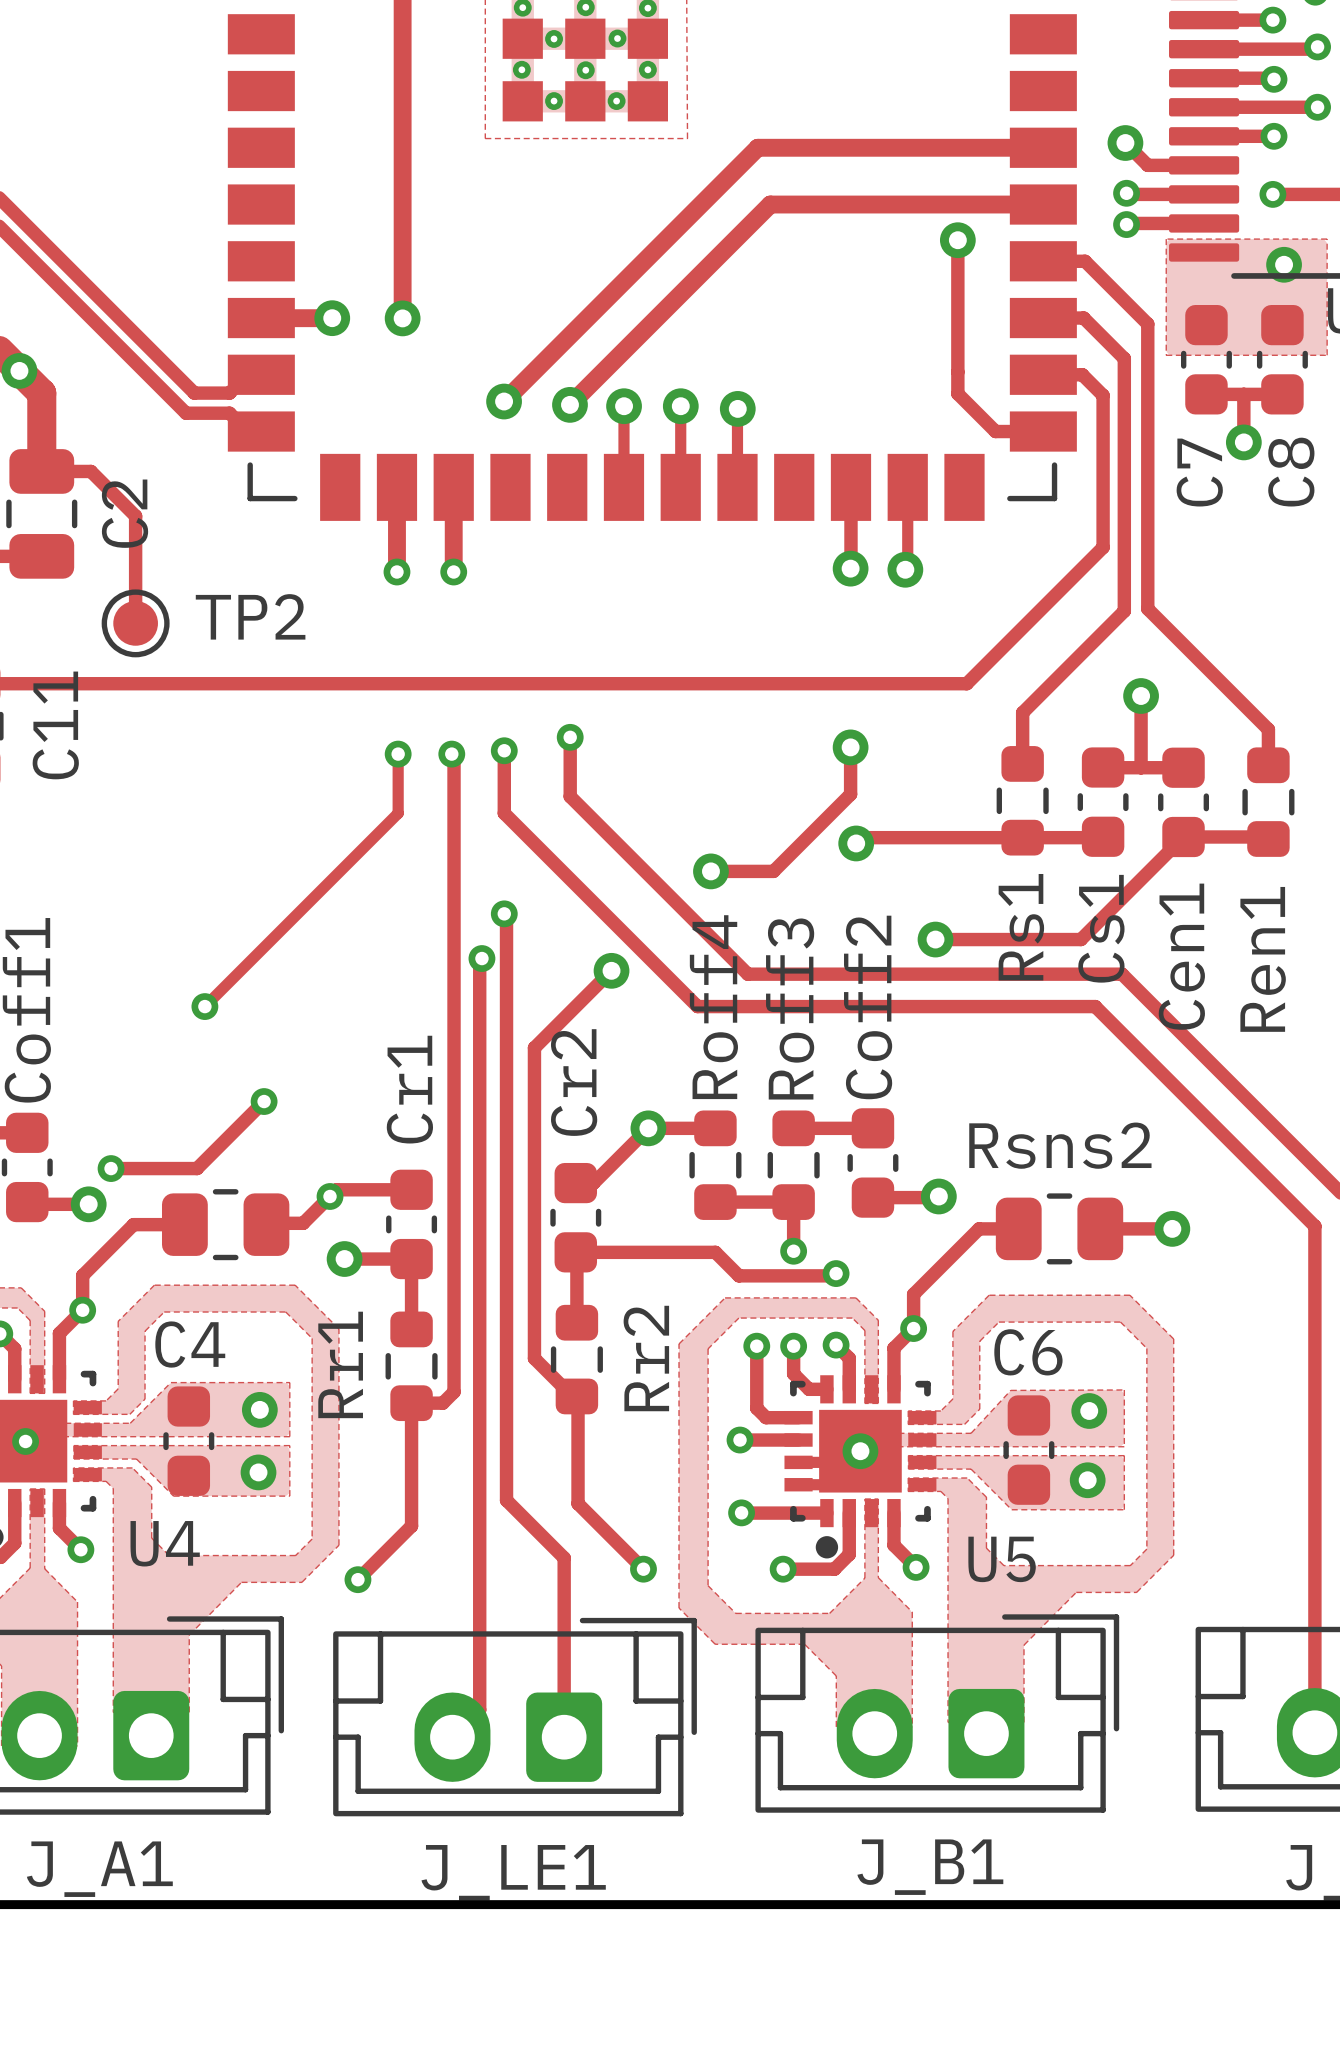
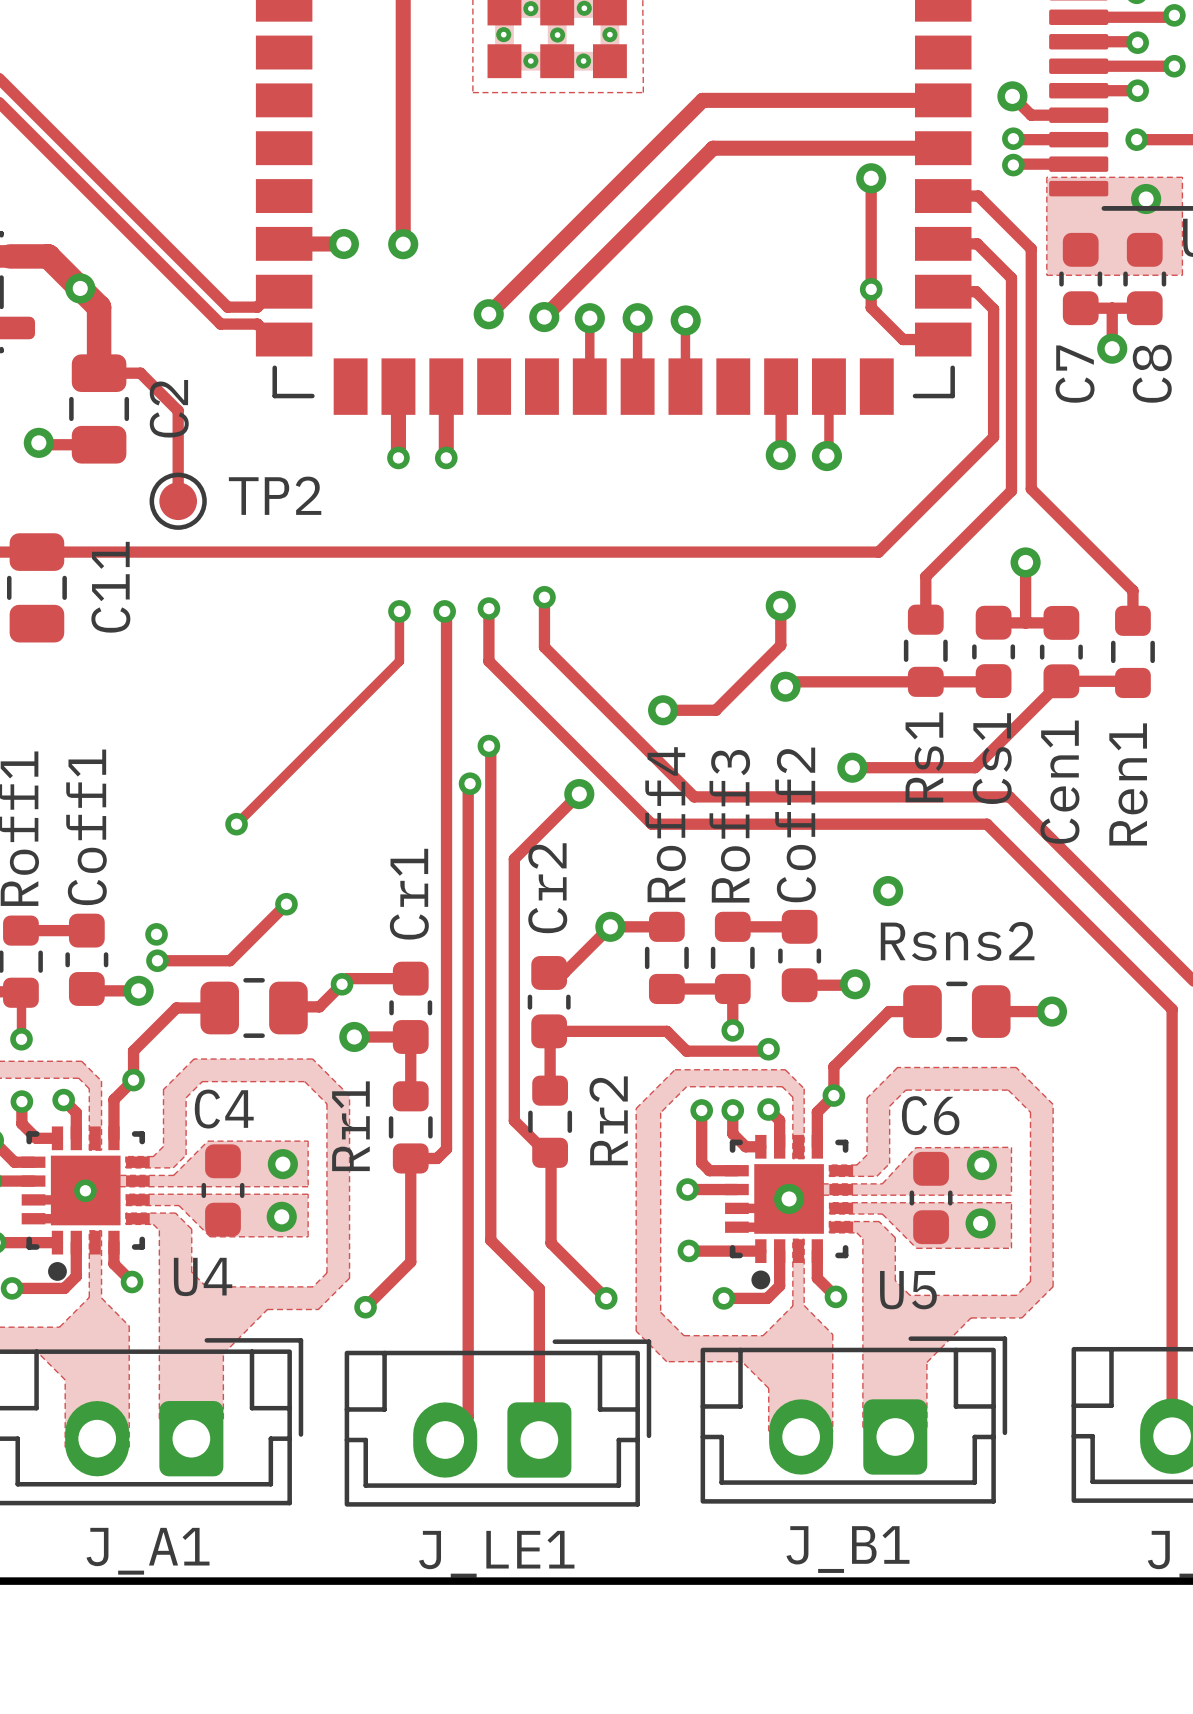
via: none -> (871, 289)
via: none -> (888, 891)
via: none -> (156, 934)

